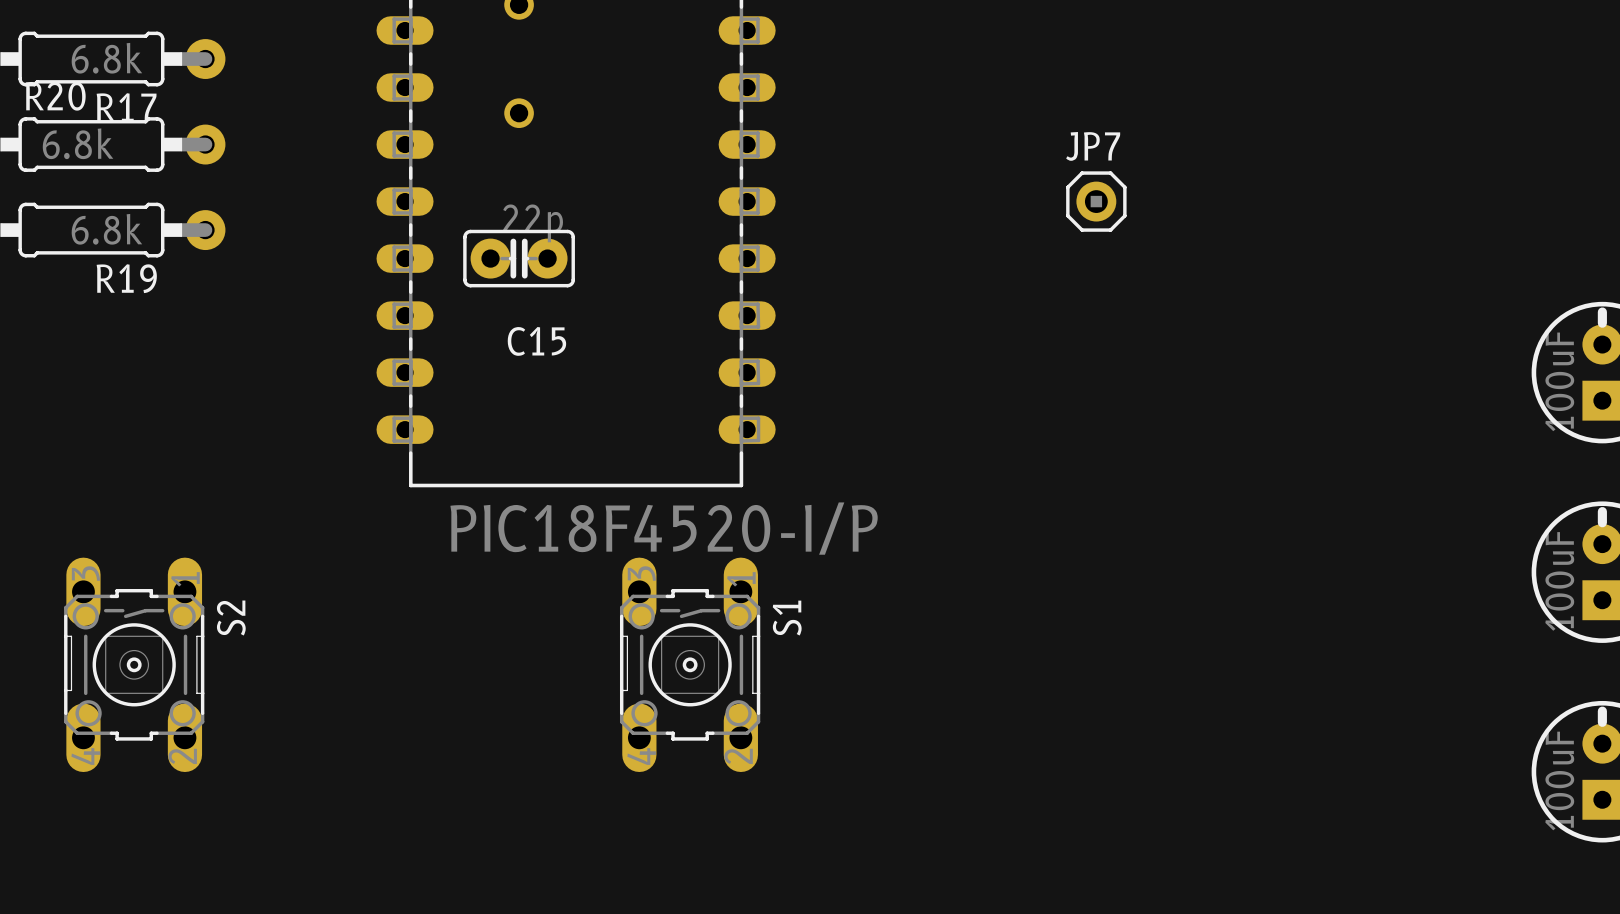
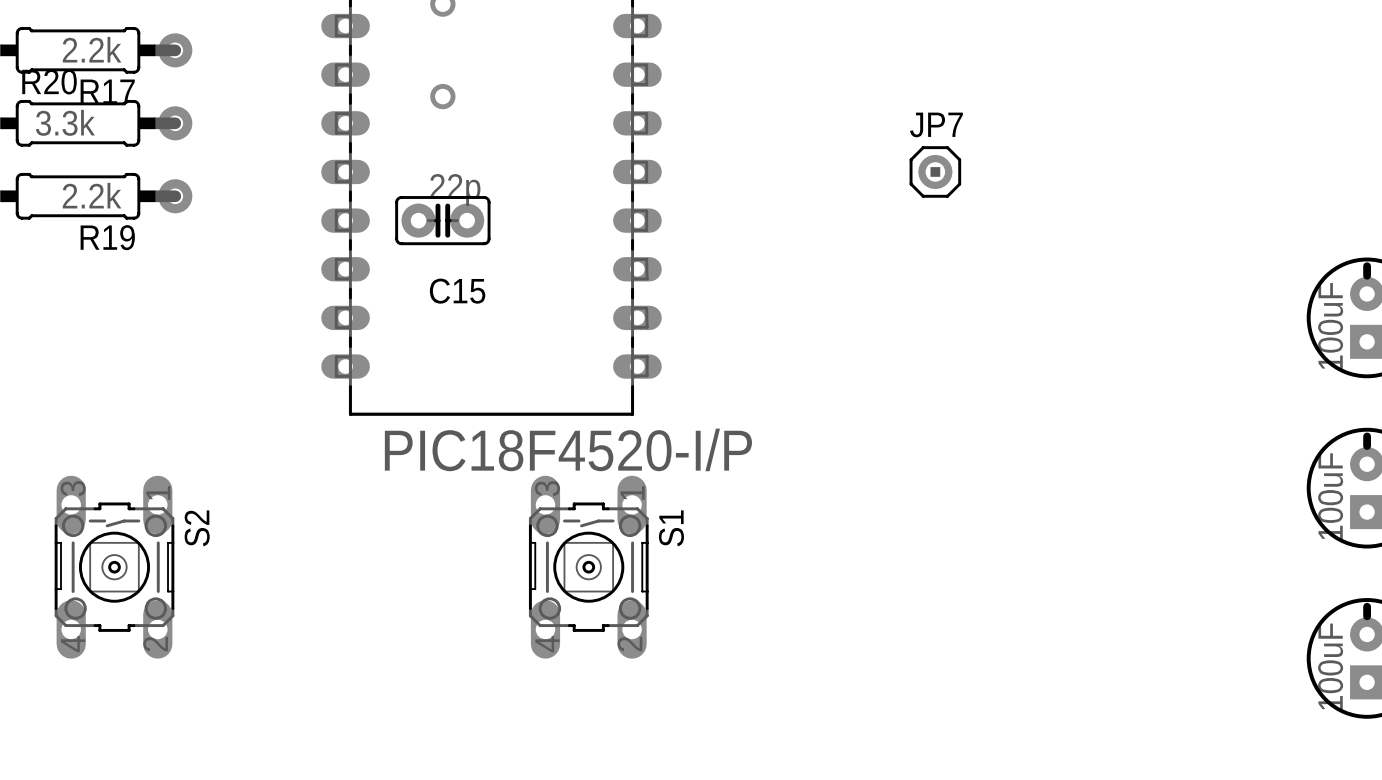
R17 value: 6.8k (106, 58) -> 2.2k (92, 49)
R20 value: 6.8k (78, 143) -> 3.3k (65, 122)
R19 value: 6.8k (106, 229) -> 2.2k (92, 195)

